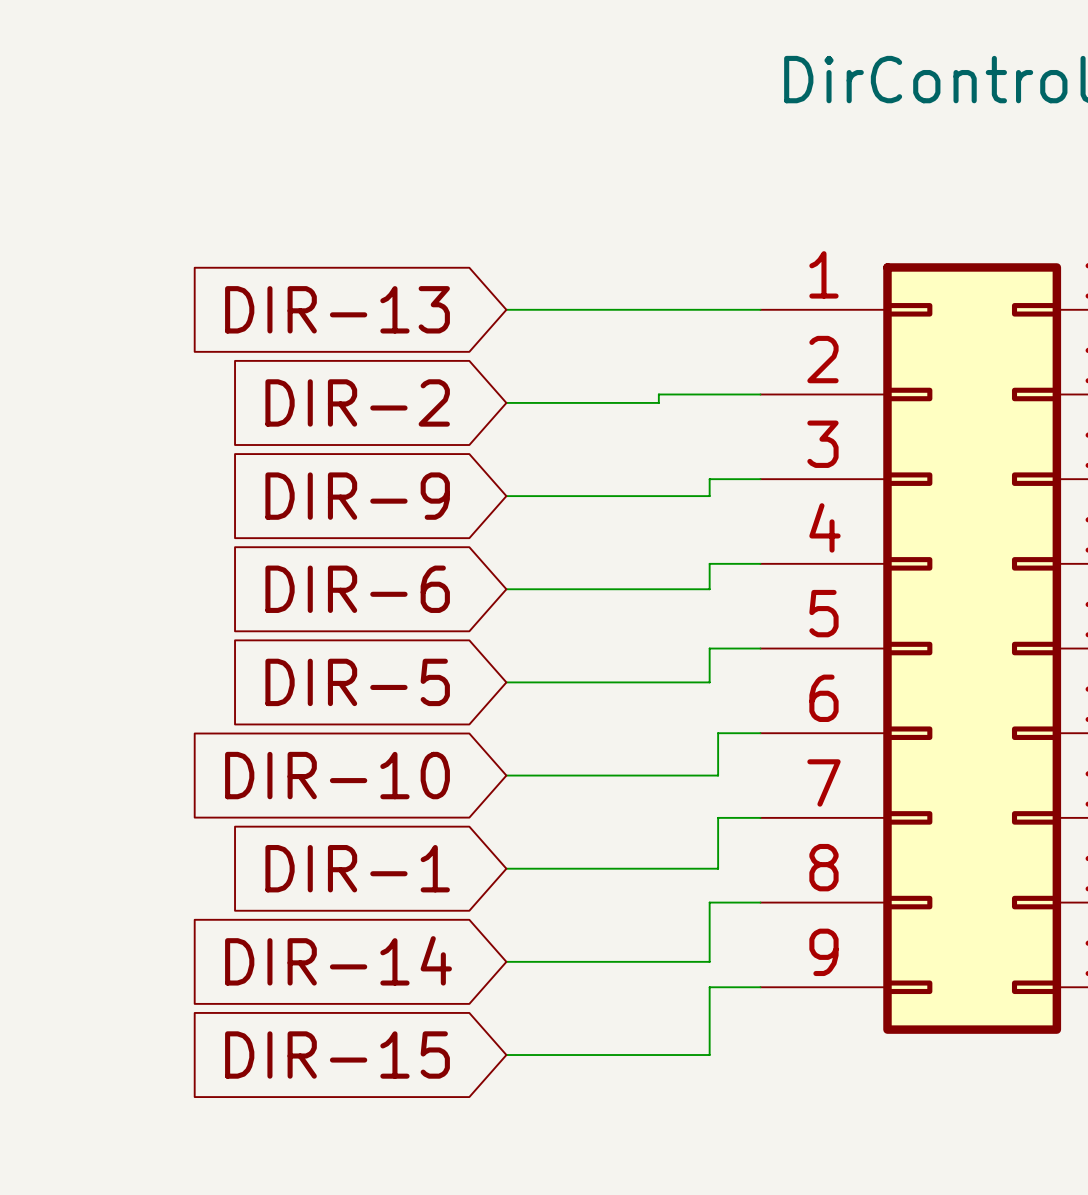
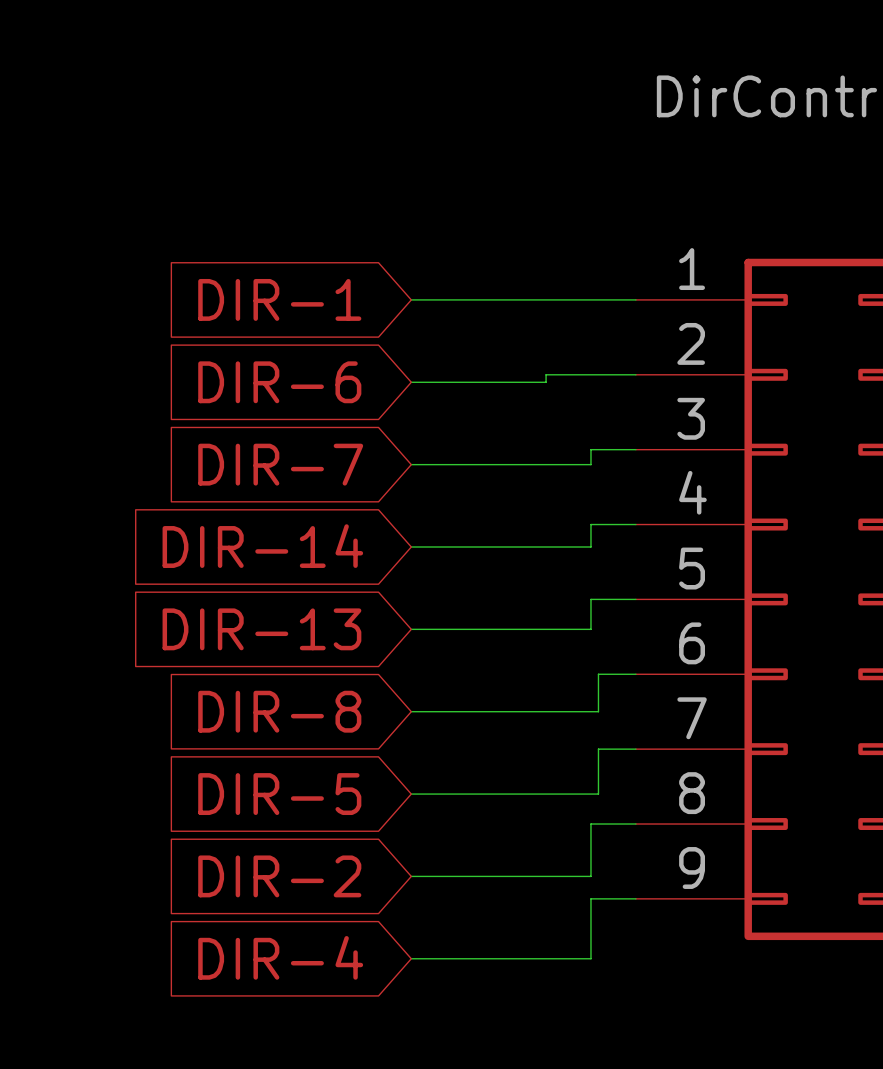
global label: DIR-13 (337, 309) -> DIR-1 (279, 299)
global label: DIR-2 (357, 402) -> DIR-6 (279, 382)
global label: DIR-9 (357, 496) -> DIR-7 (280, 464)
global label: DIR-6 (357, 589) -> DIR-14 (262, 546)
global label: DIR-5 (357, 682) -> DIR-13 (261, 629)
global label: DIR-10 (337, 775) -> DIR-8 (279, 711)
global label: DIR-1 (357, 868) -> DIR-5 (279, 794)
global label: DIR-14 (338, 960) -> DIR-2 (279, 876)
global label: DIR-15 (337, 1055) -> DIR-4 (280, 957)

